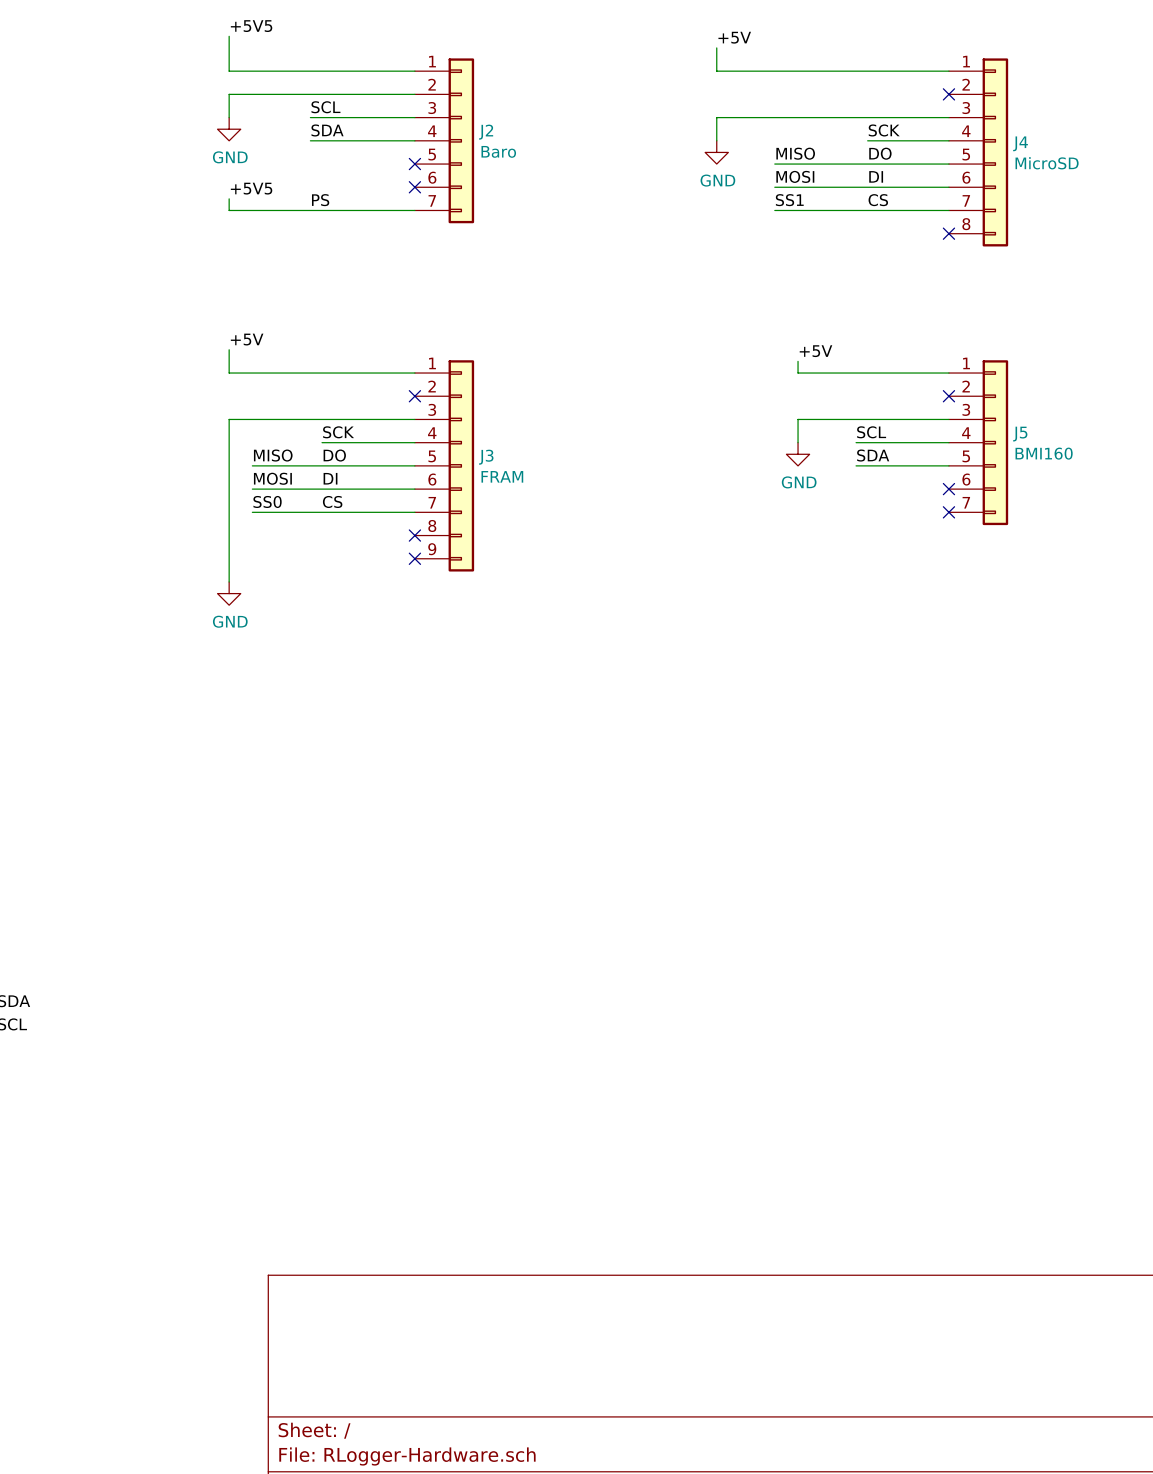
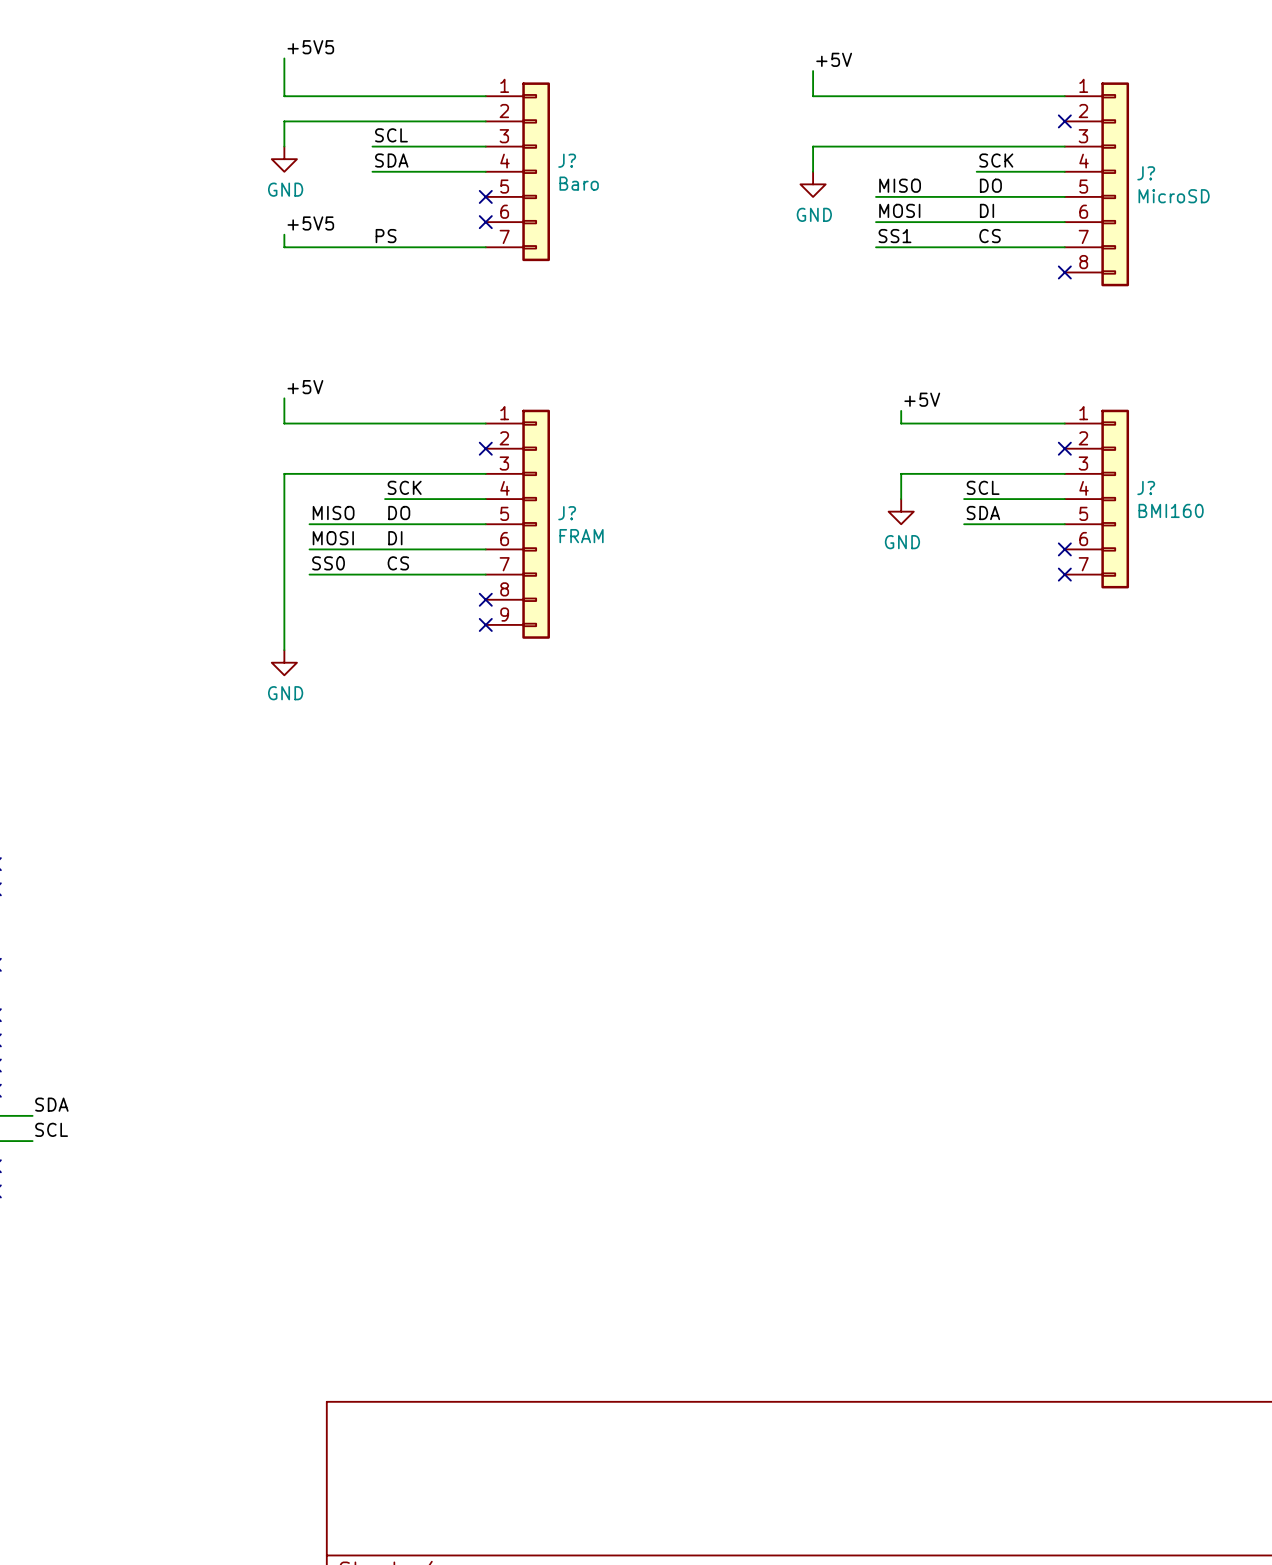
J2 name: J2 (486, 132) -> J? (567, 160)
J4 name: J4 (1020, 143) -> J? (1146, 173)
J5 name: J5 (1020, 434) -> J? (1146, 488)
J3 name: J3 (486, 457) -> J? (567, 513)

